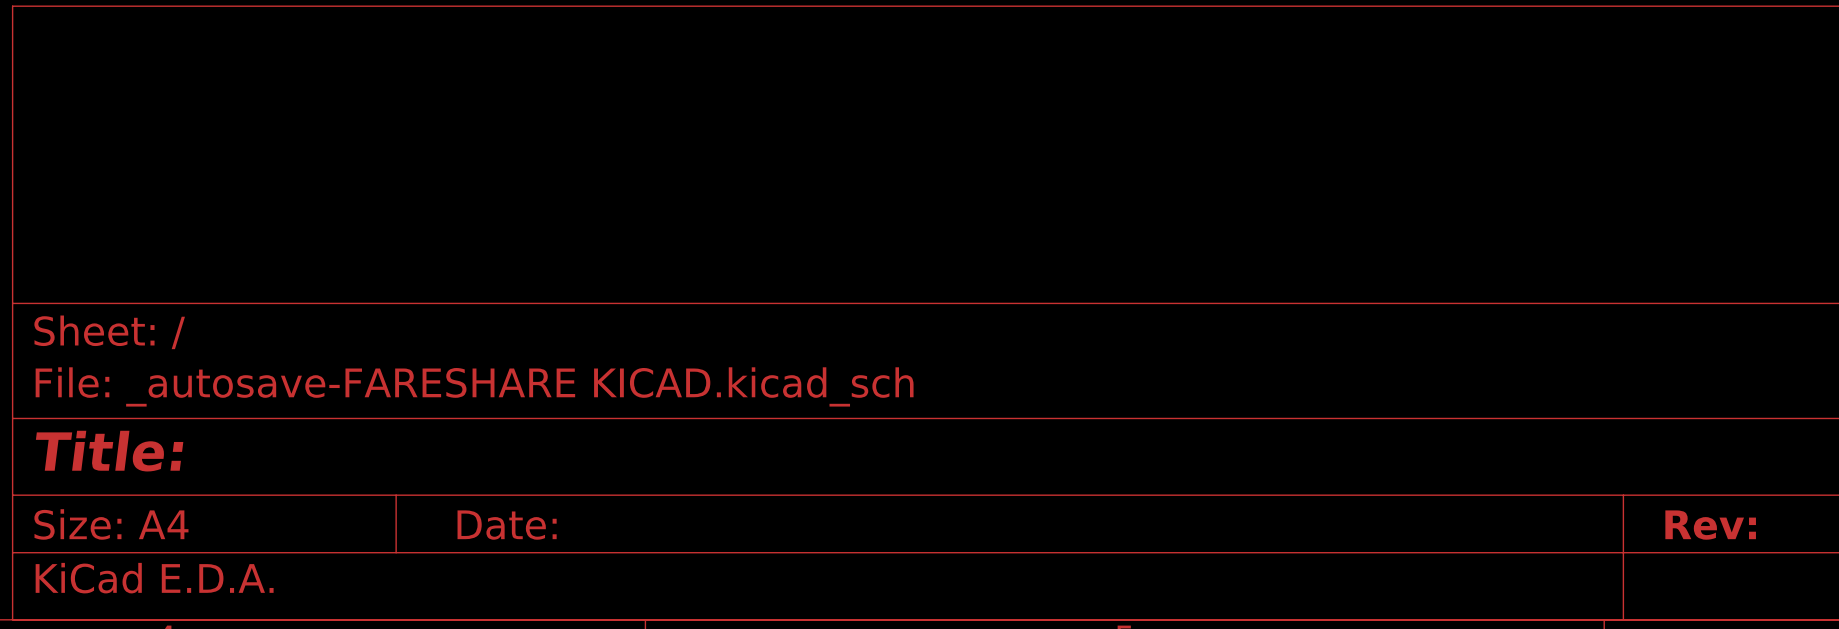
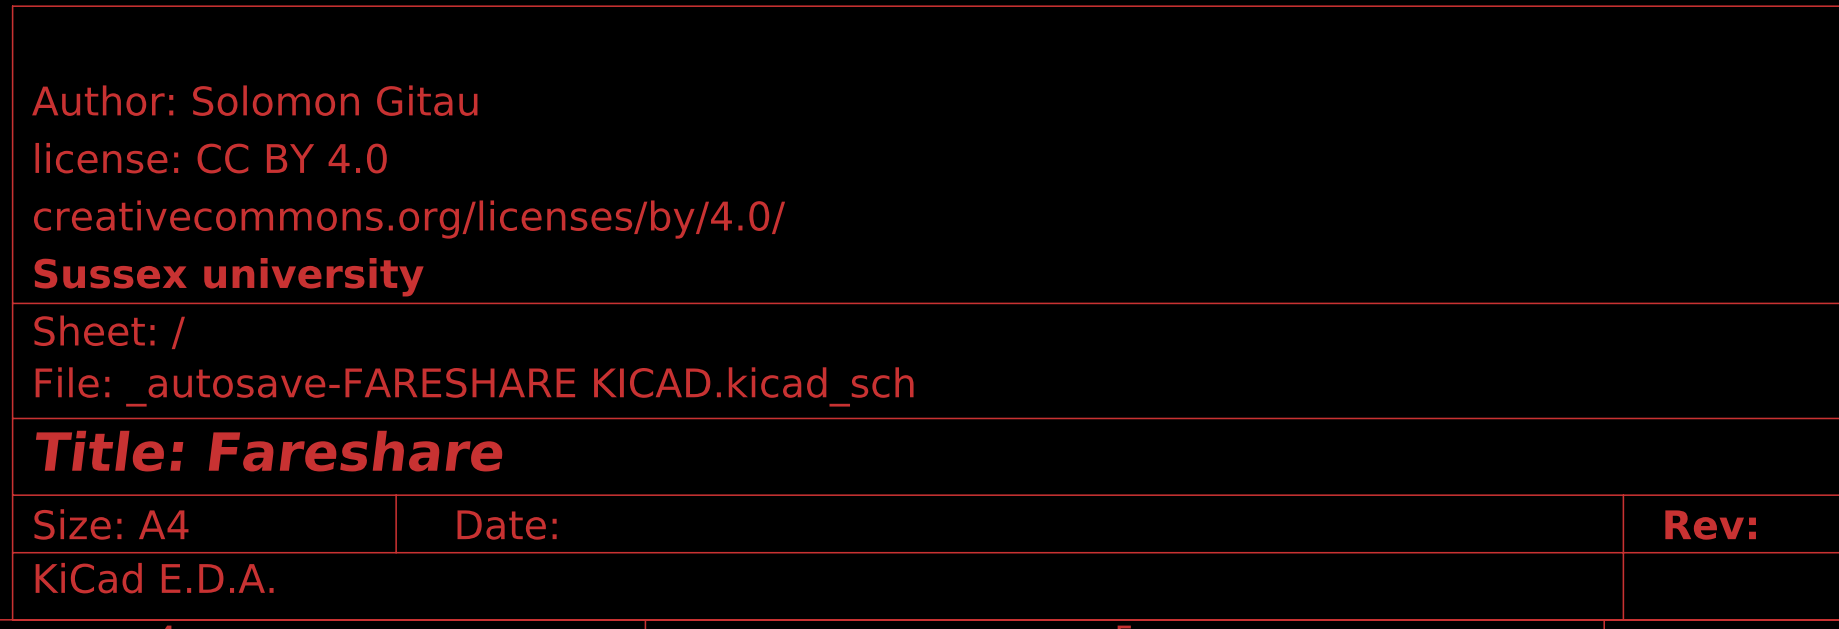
title block: none -> Author: Solomon Gitau (254, 100)
title block: none -> license: CC BY 4.0 (211, 158)
title block: none -> creativecommons.org/licenses/by/4.0/ (409, 219)
title block: none -> Sussex university (229, 277)
title block: Title: (109, 451) -> Title: Fareshare (269, 451)

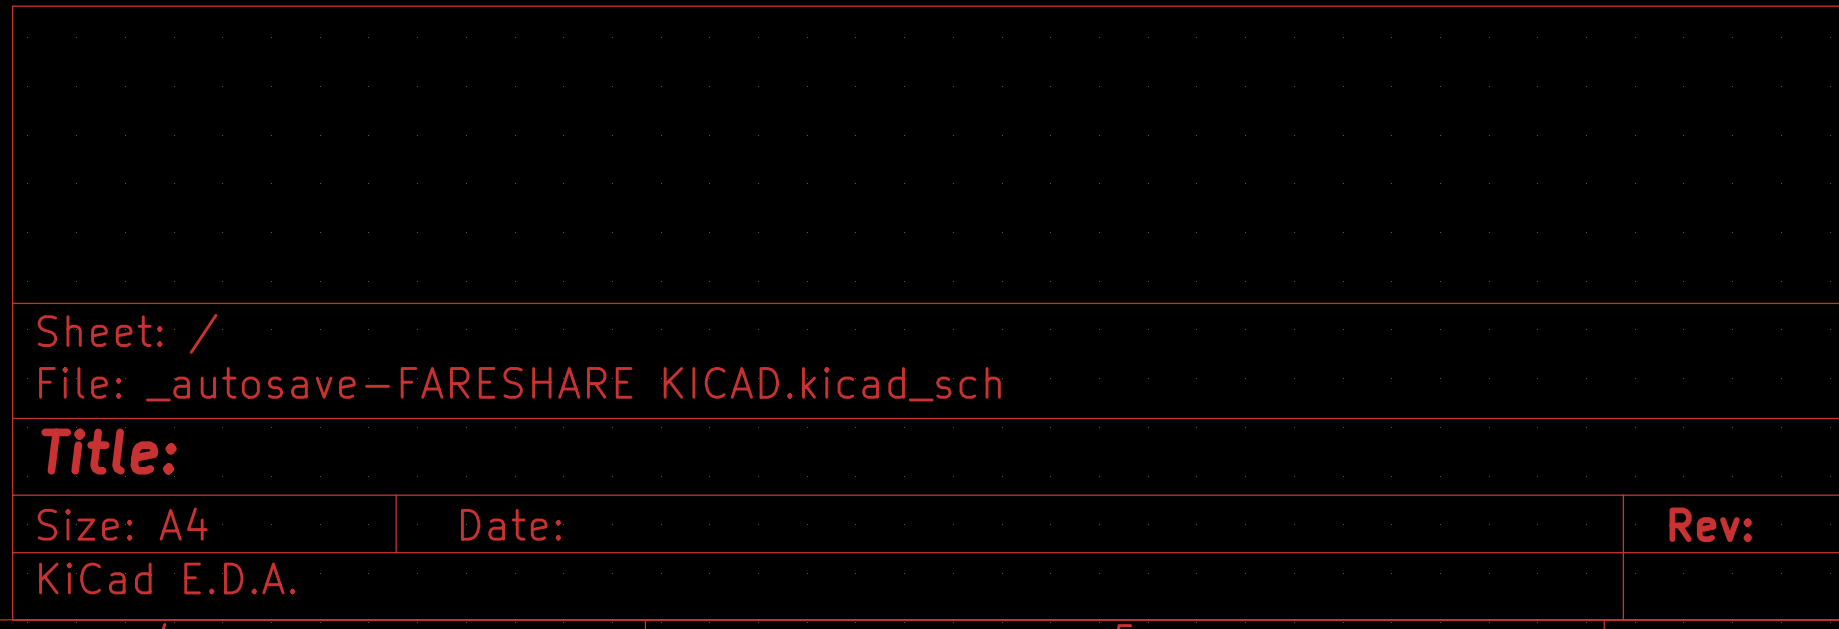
title block: Author: Solomon Gitau (254, 100) -> none
title block: license: CC BY 4.0 (211, 158) -> none
title block: creativecommons.org/licenses/by/4.0/ (409, 219) -> none
title block: Sussex university (229, 277) -> none
title block: Title: Fareshare (269, 451) -> Title: (109, 451)

